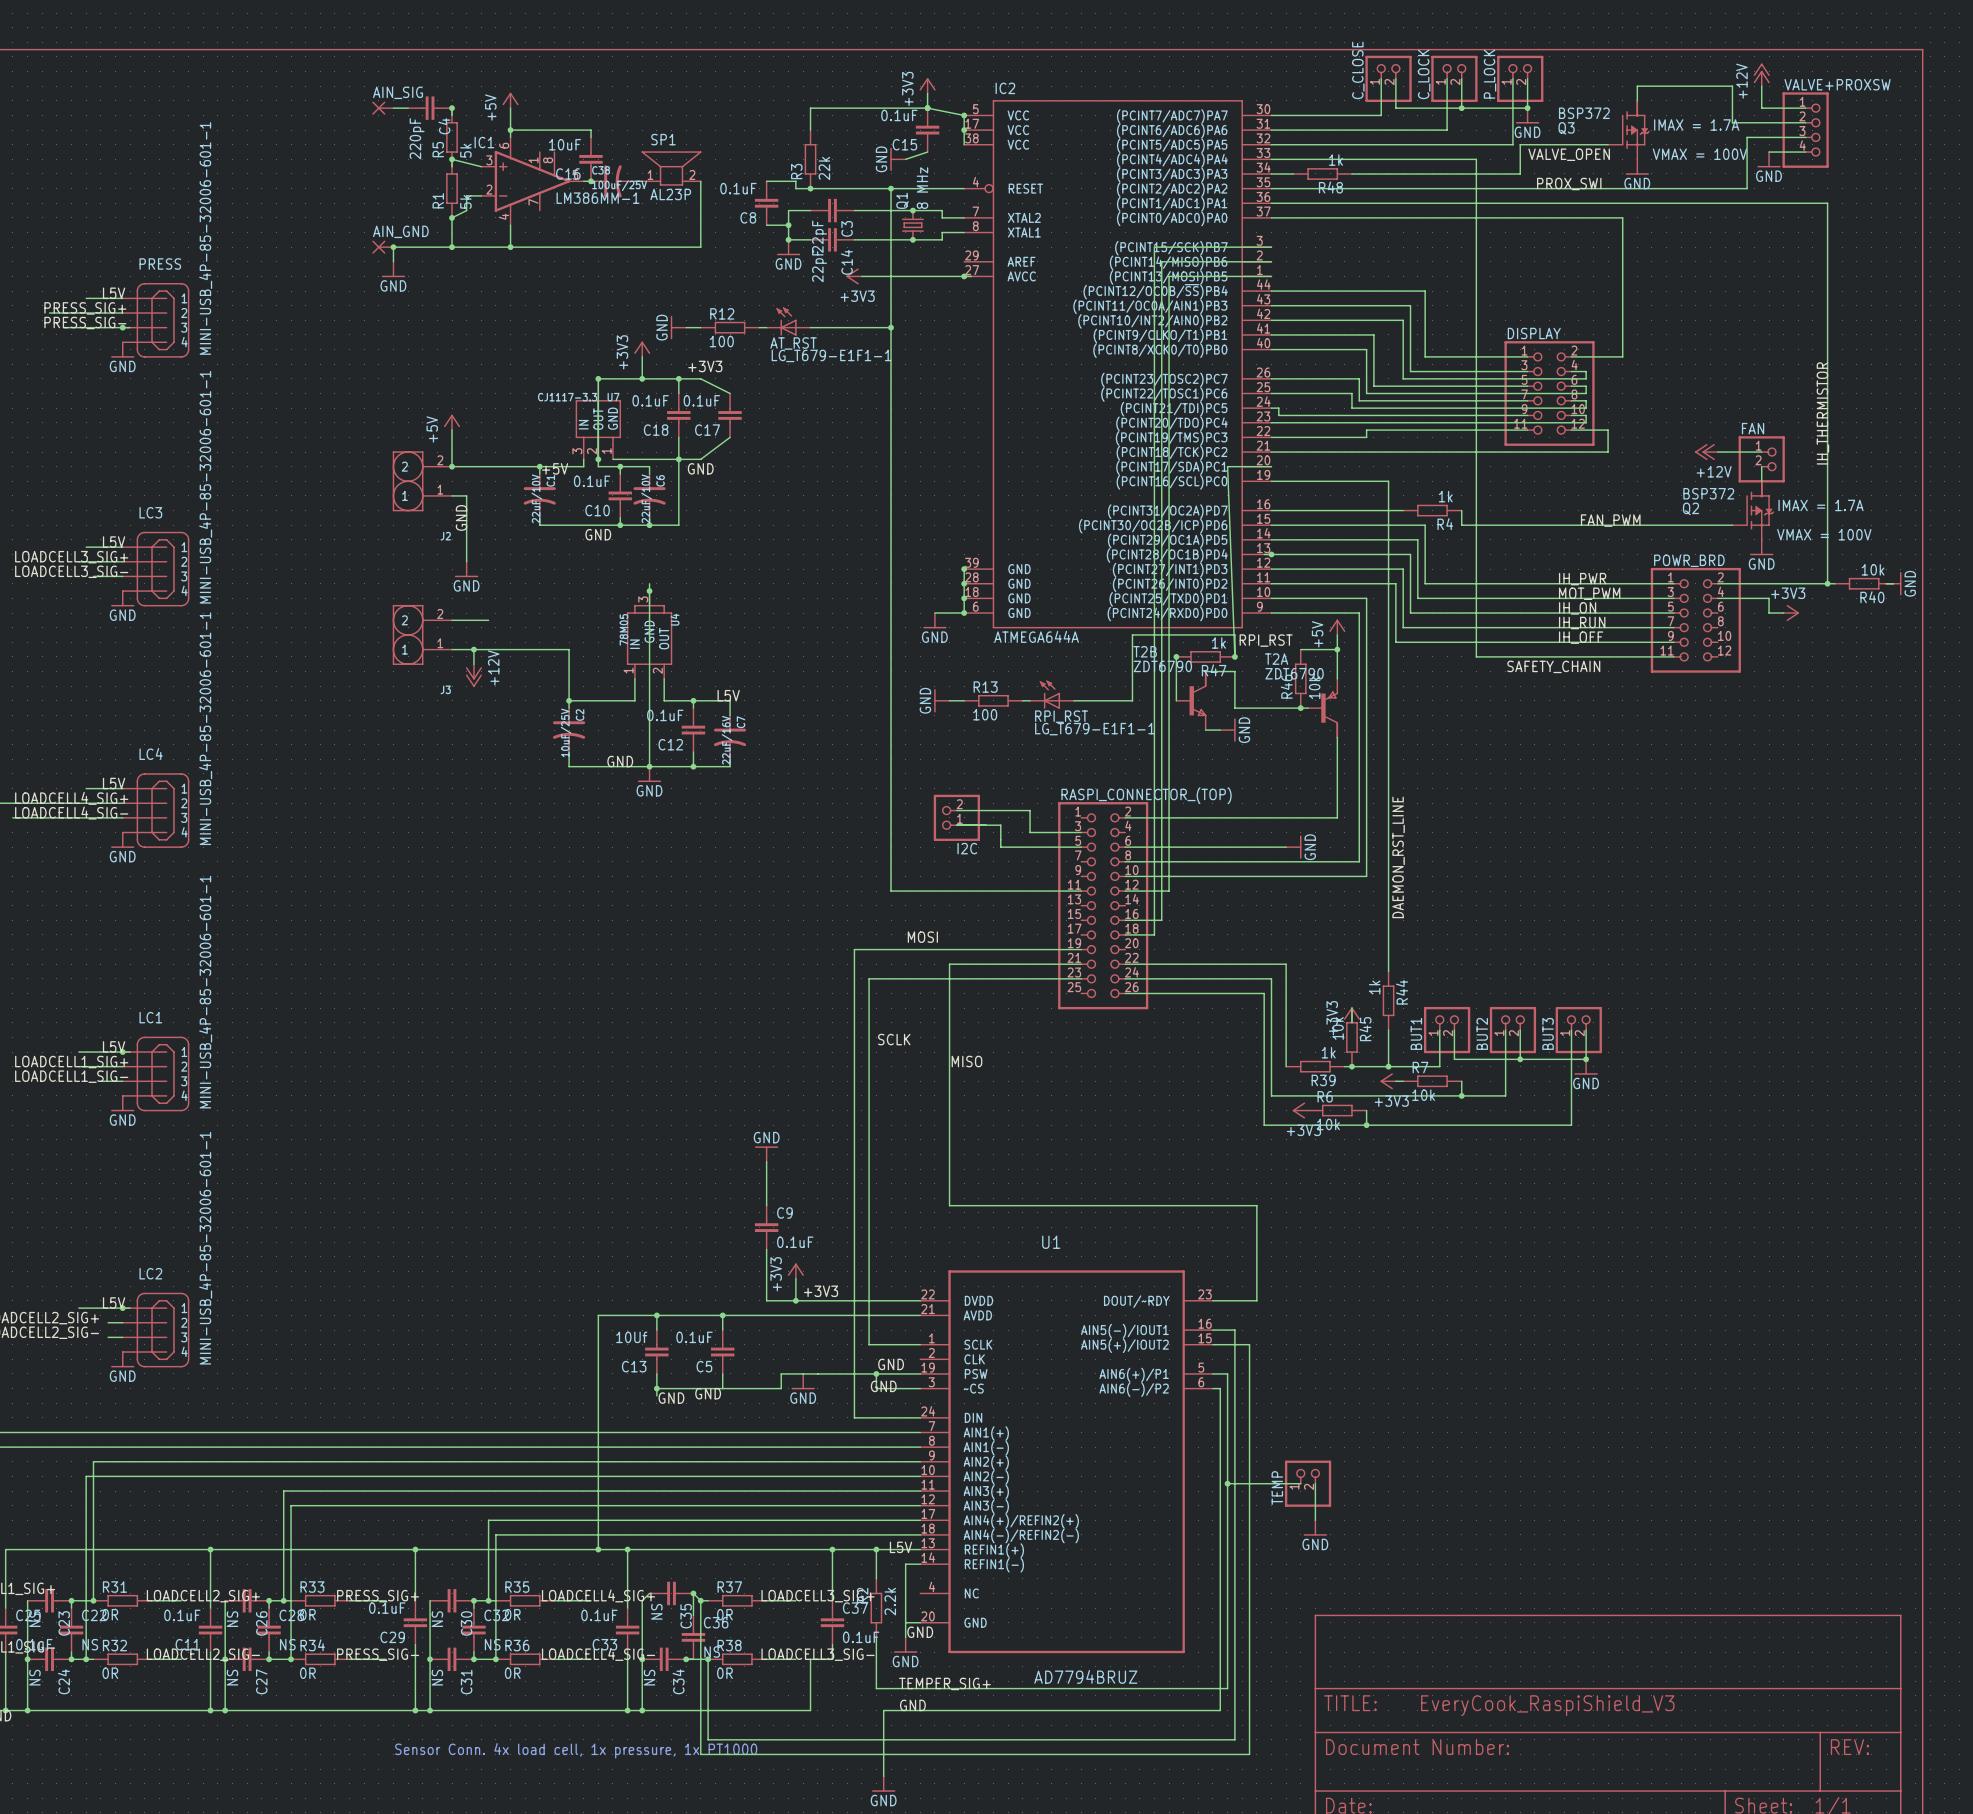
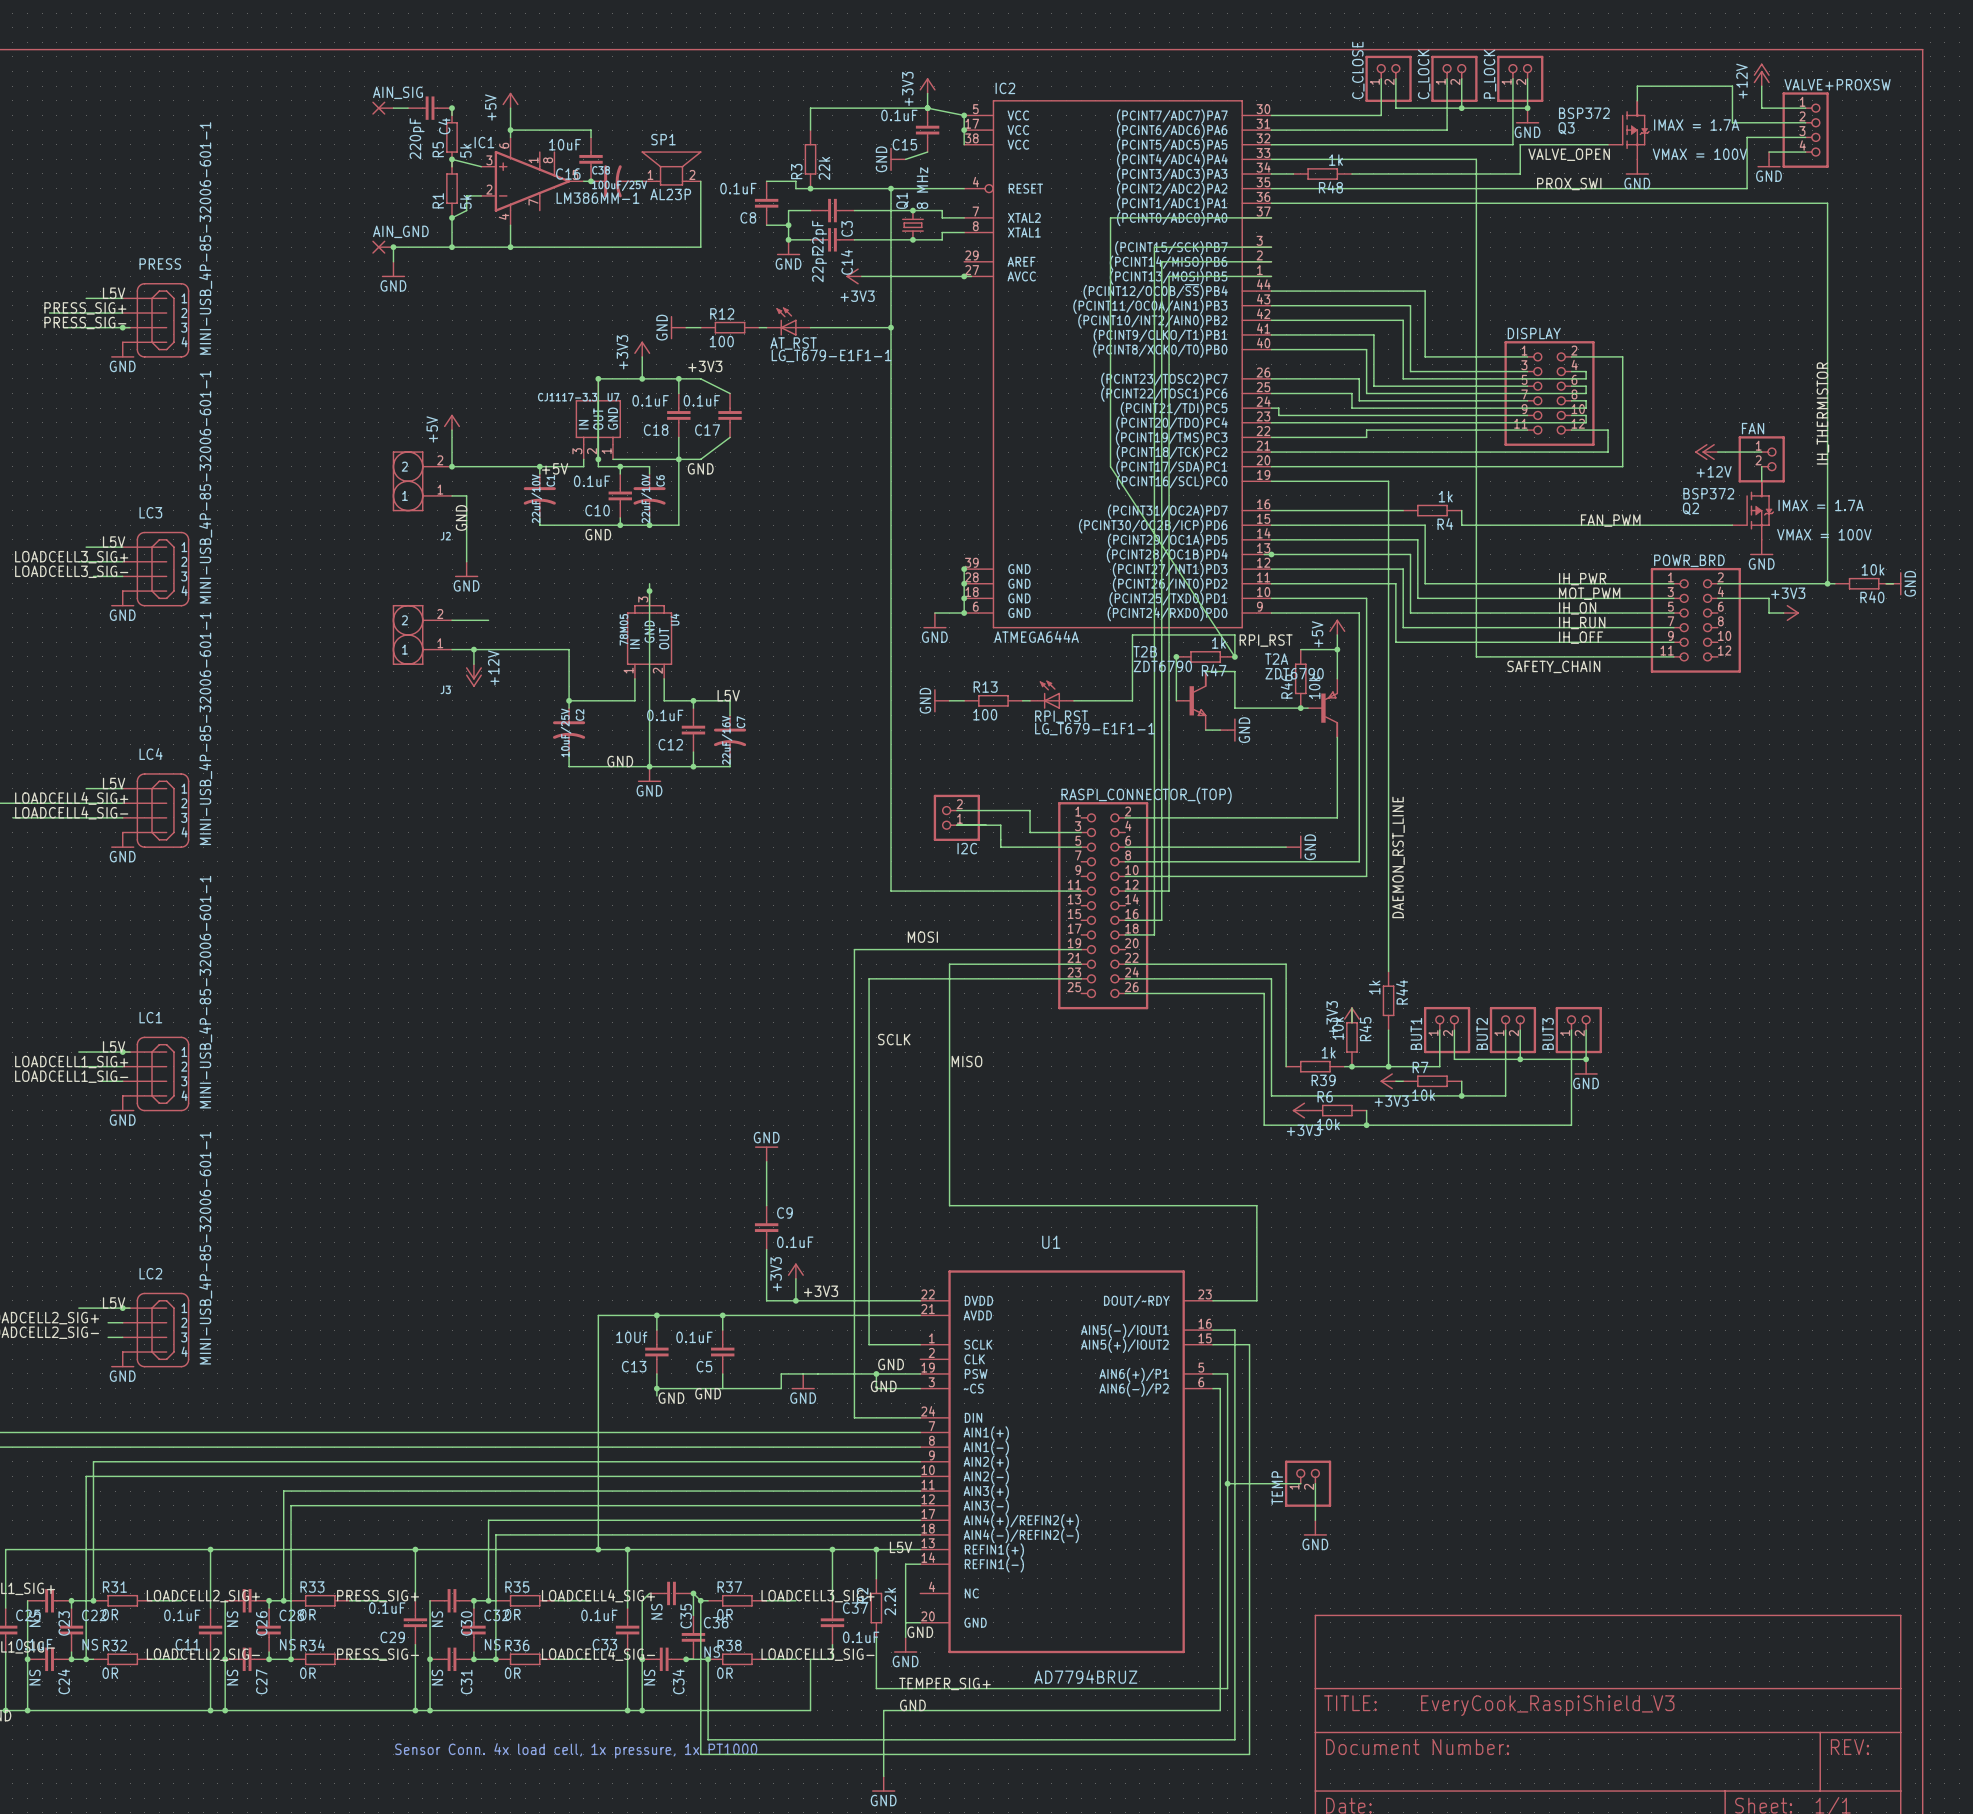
wire: (1271, 217) (1622, 217) (1622, 356) -> (1271, 466) (1622, 466) (1622, 356)
wire: (1271, 466) (1227, 466) (1234, 656) -> (1271, 217) (1110, 217) (1110, 466) (1234, 656)

